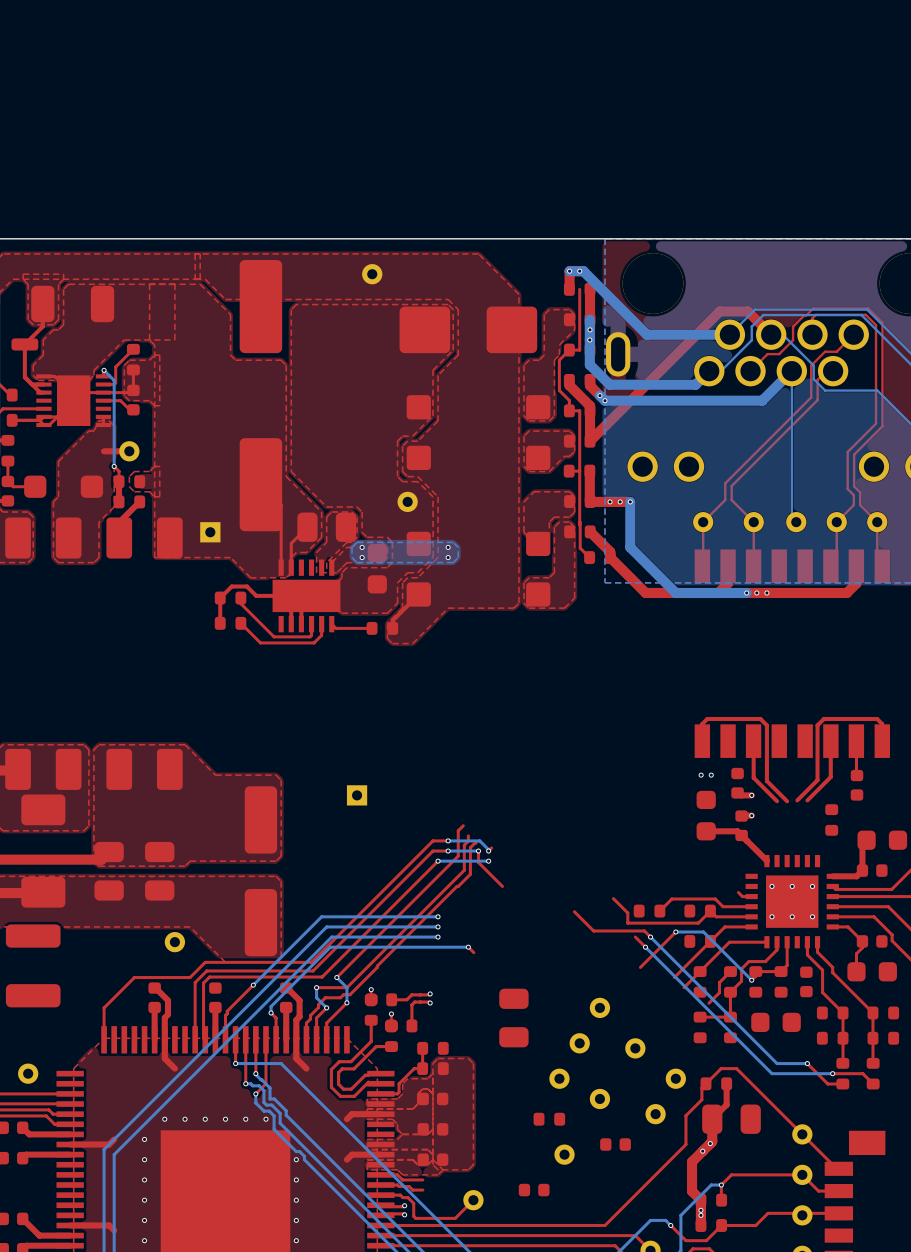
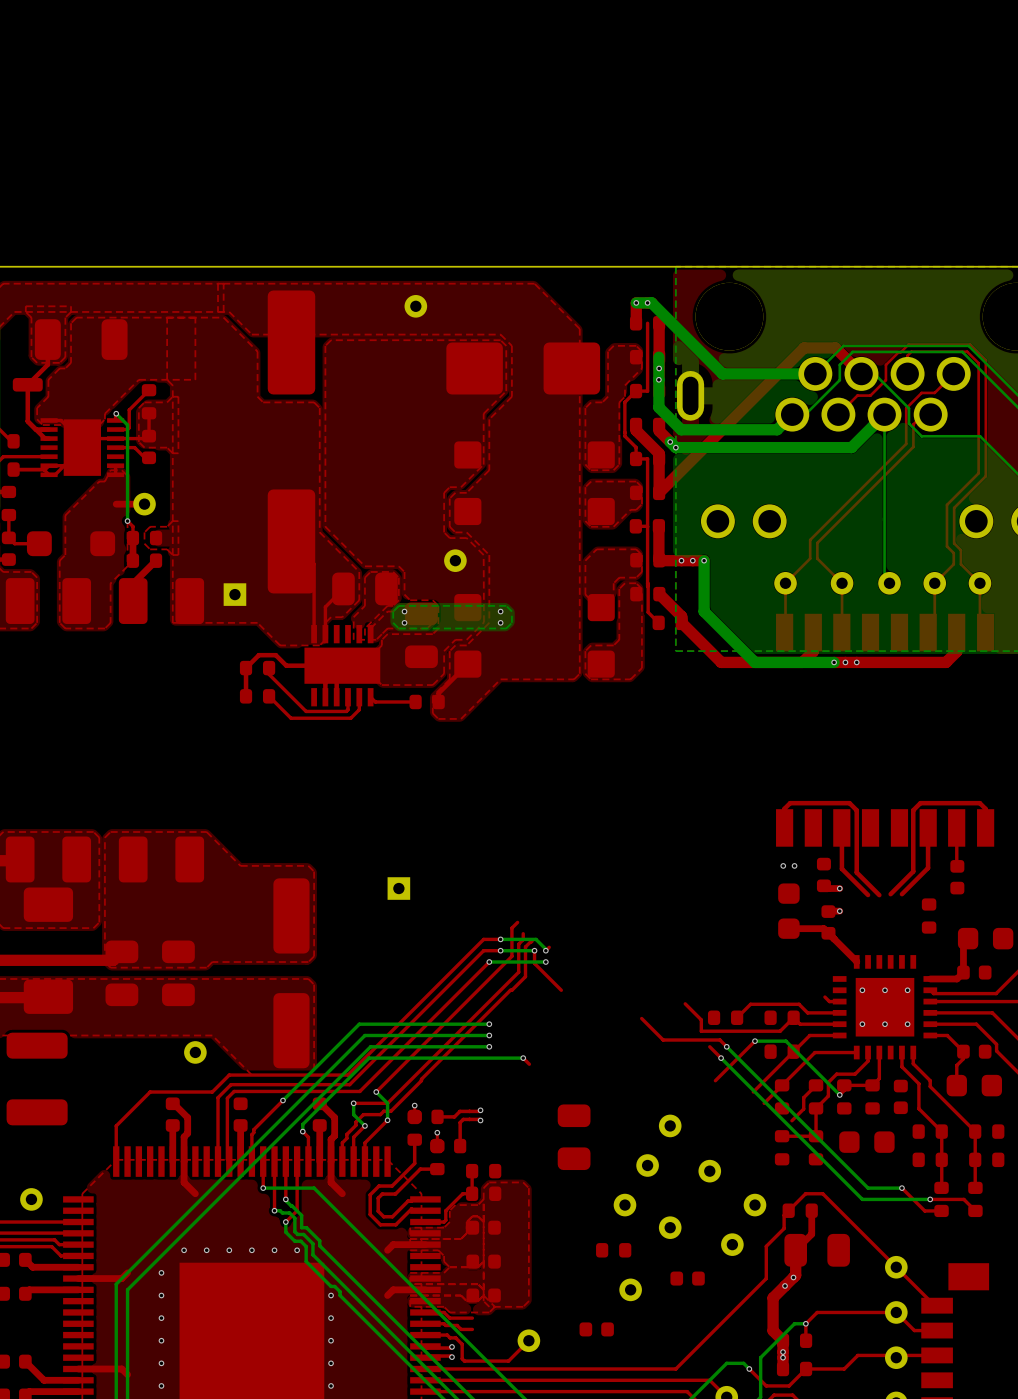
part footprint: [367, 543, 387, 594] -> [405, 602, 438, 669]

